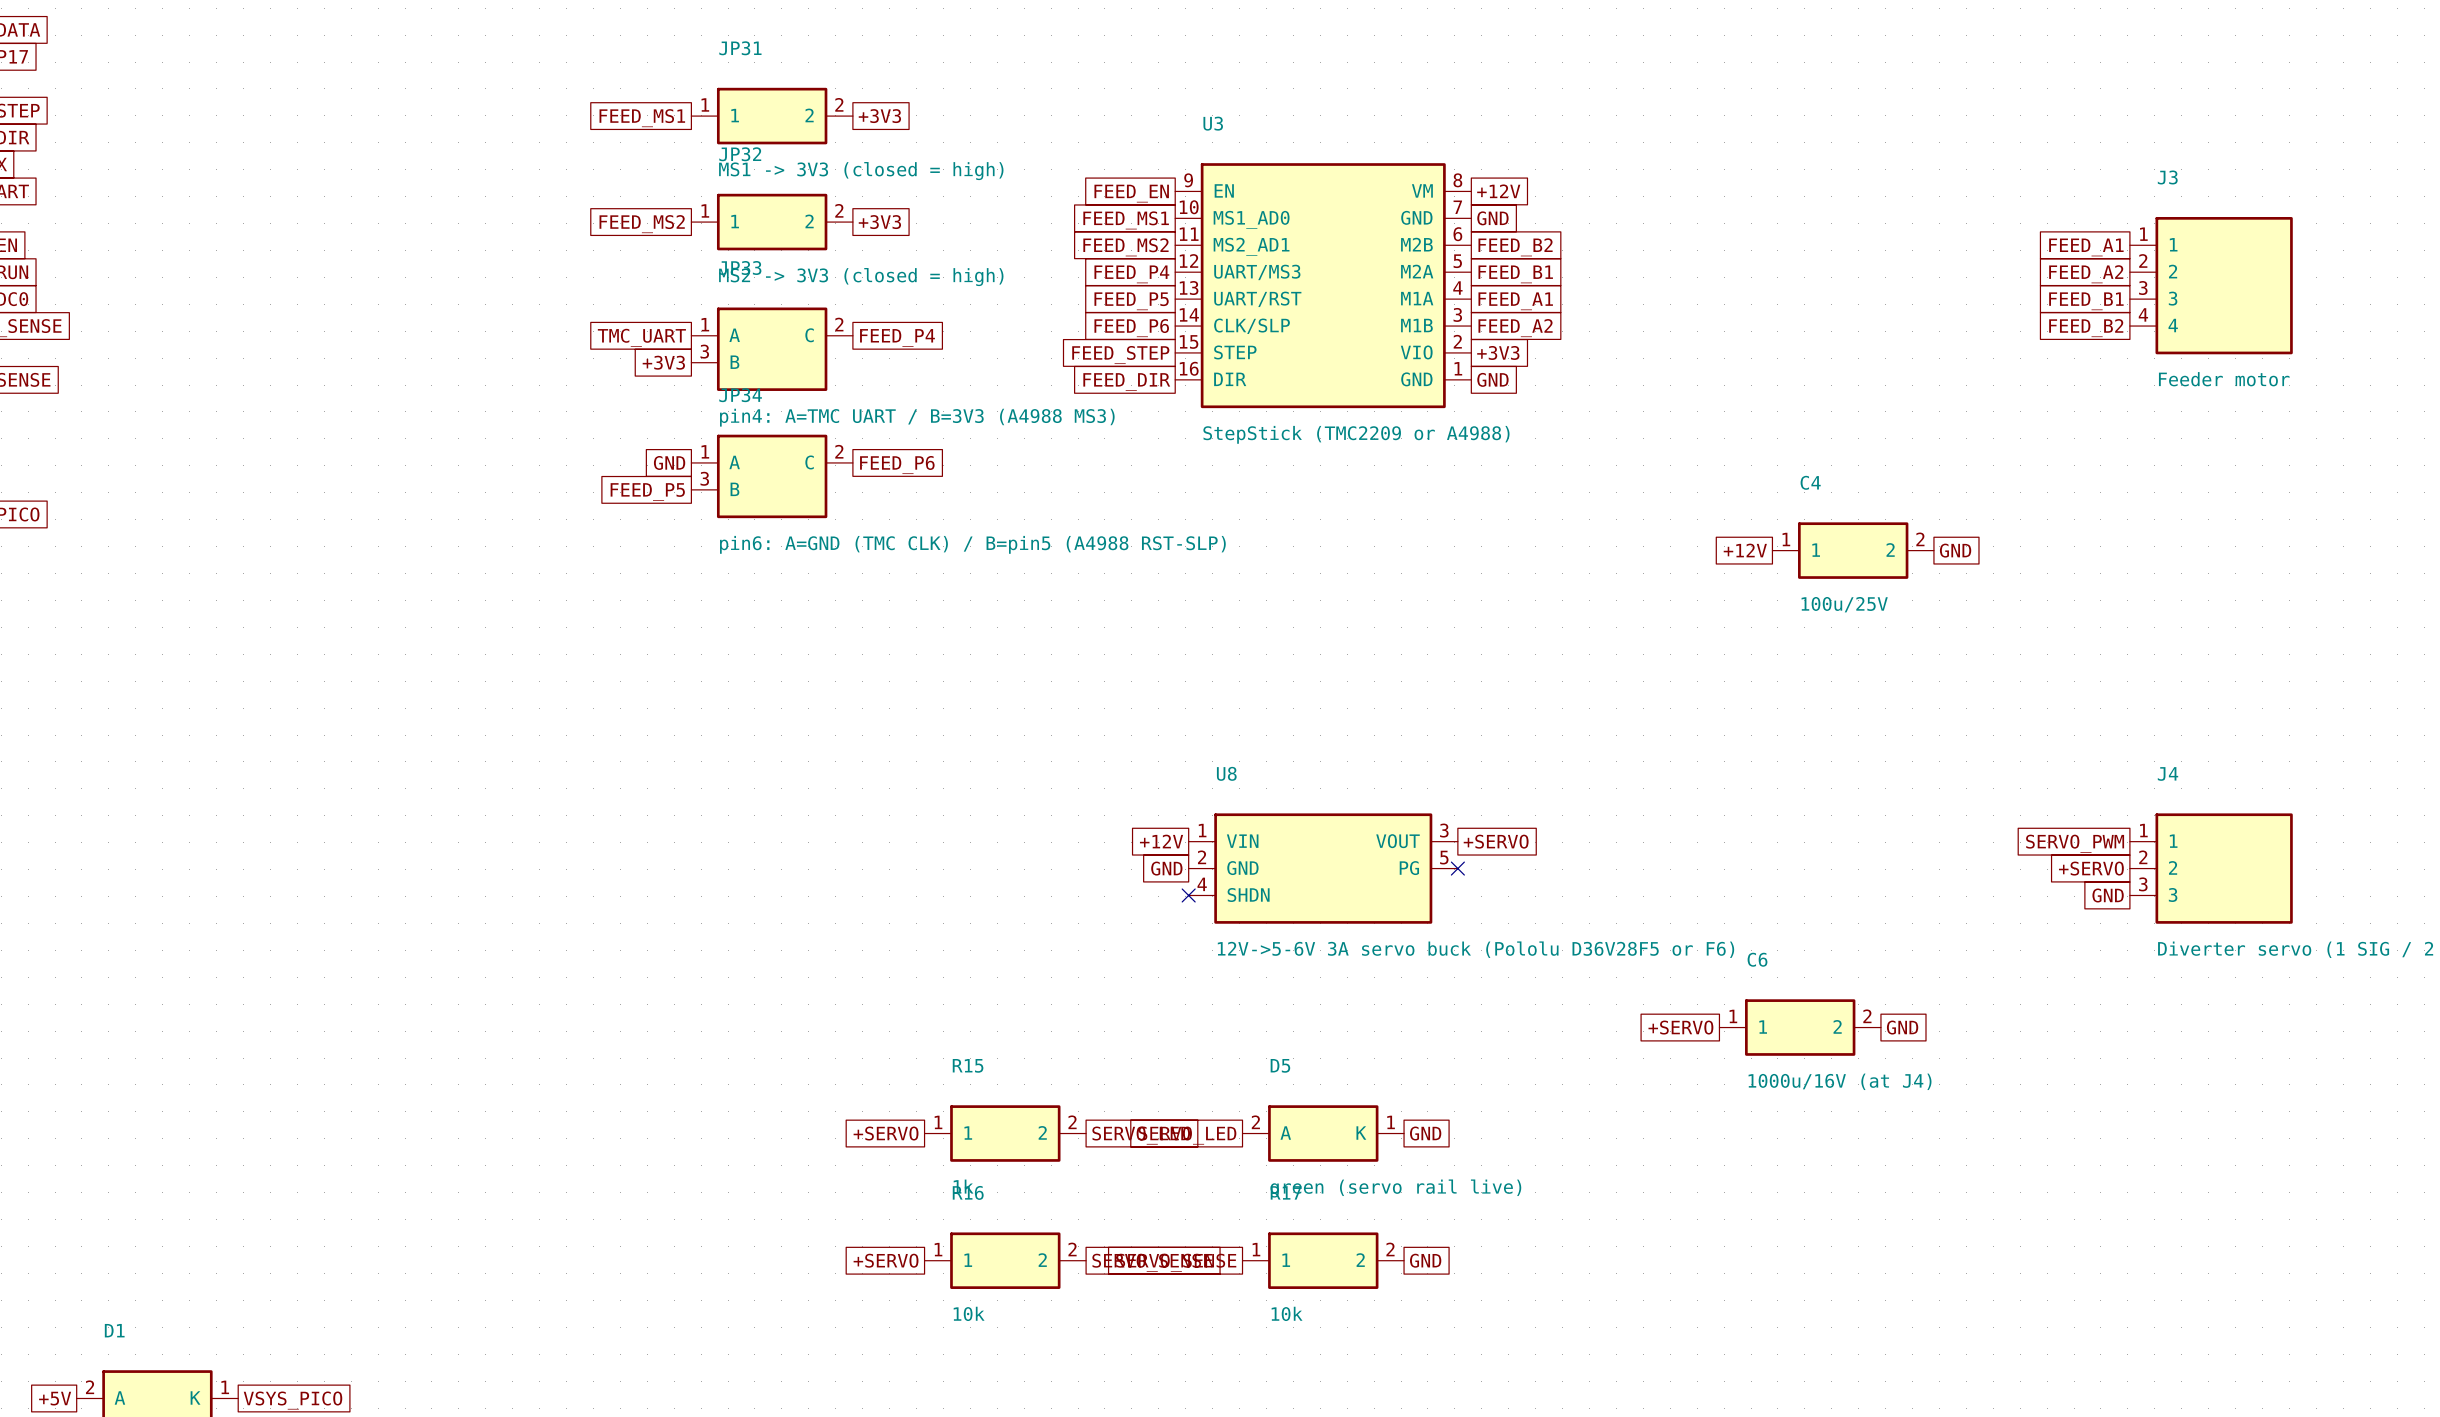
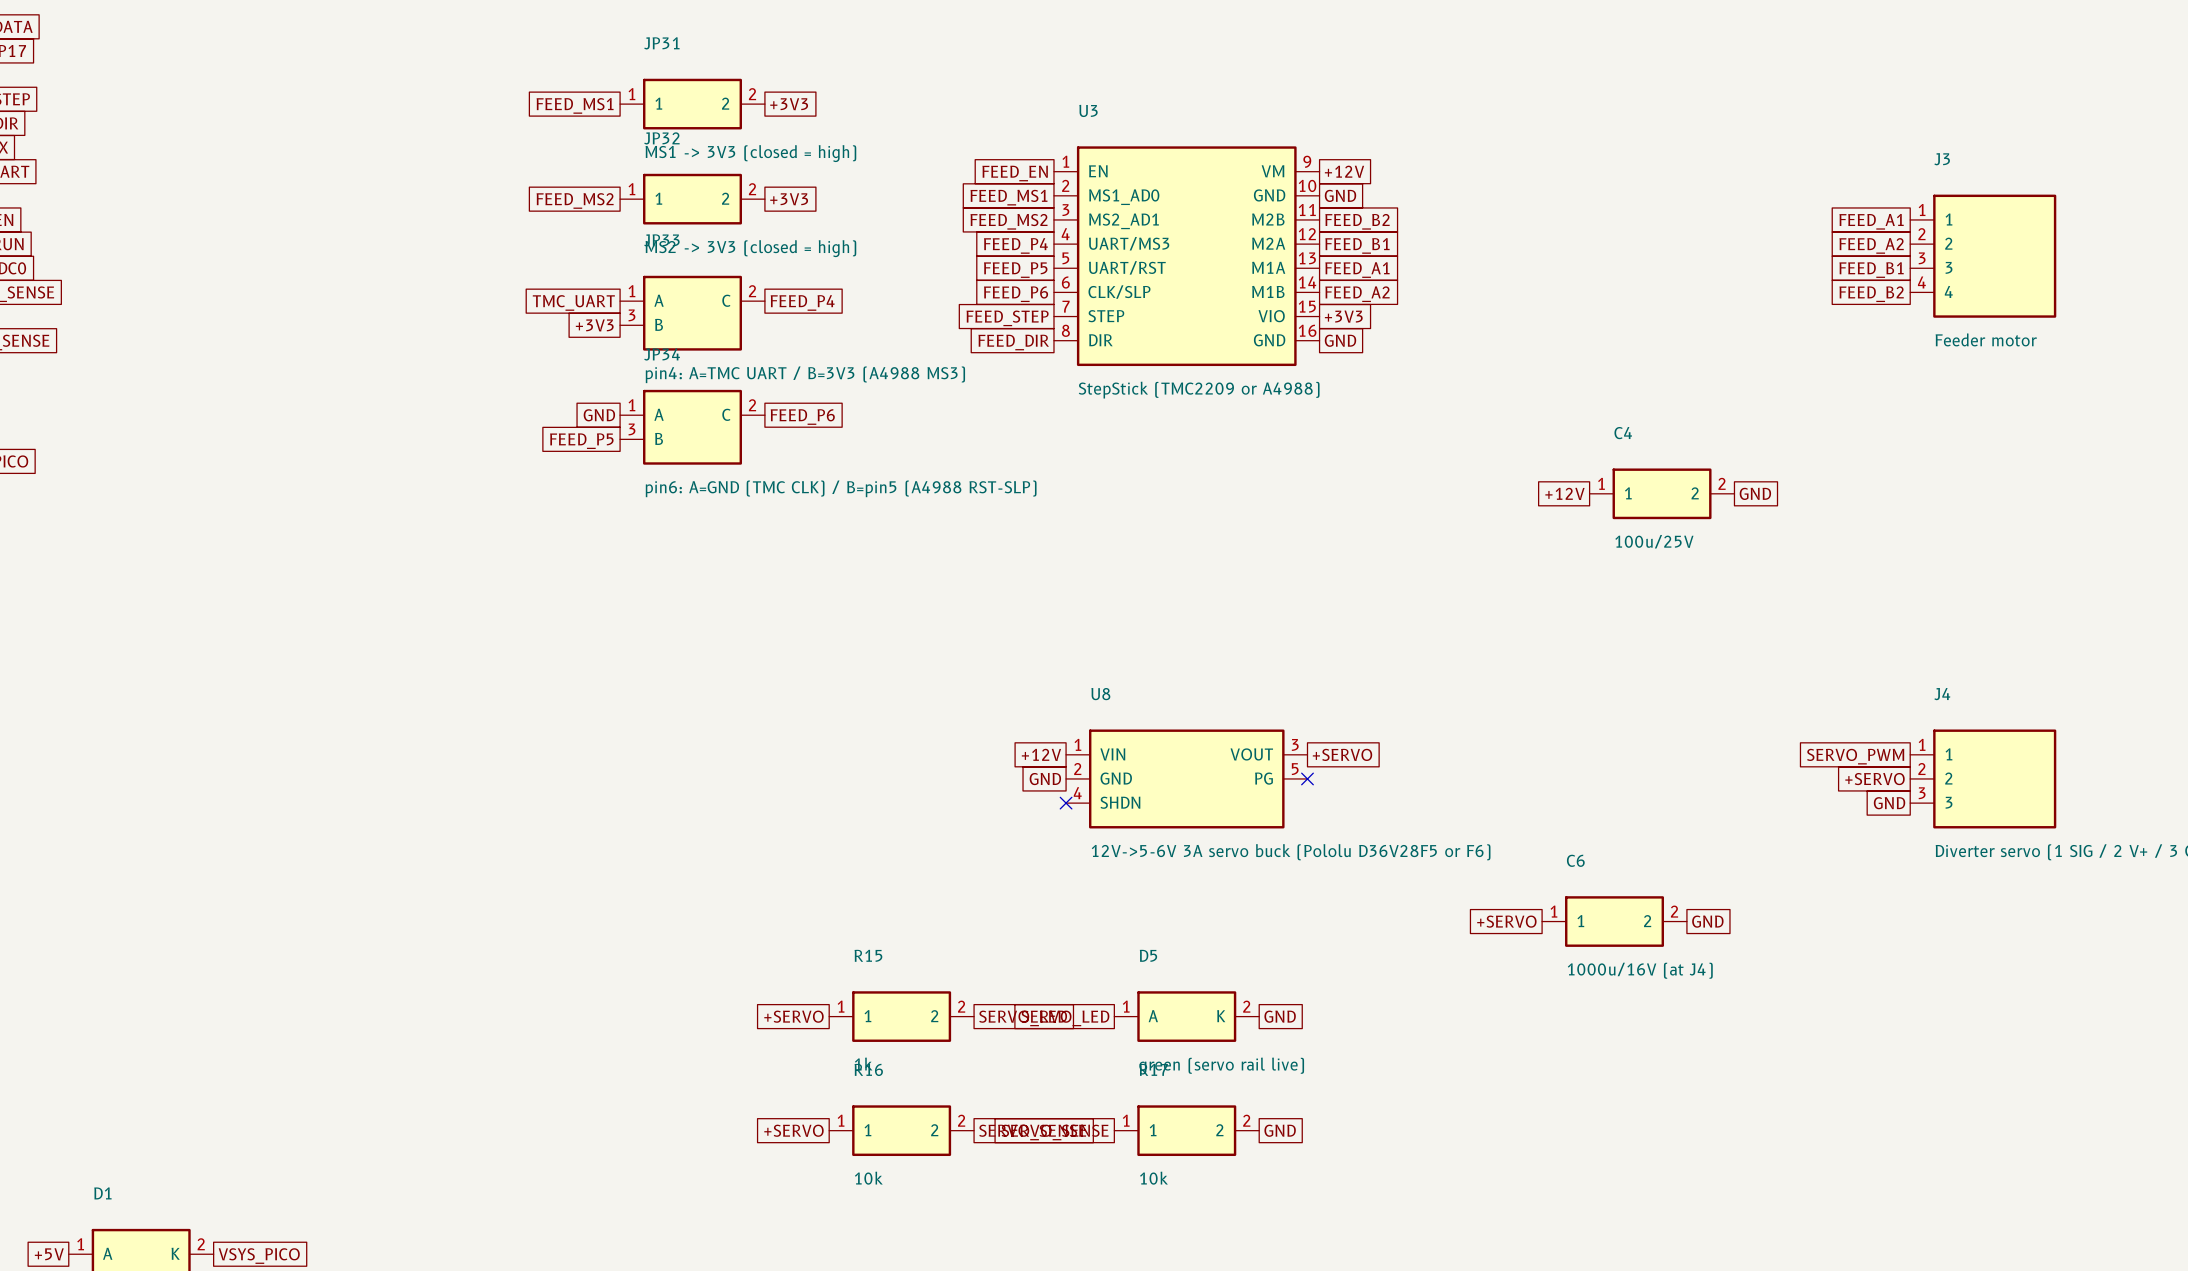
U3 symbol: [1175, 163, 1472, 409] -> [1053, 146, 1320, 367]
D5 pin number: 2 (1255, 1122) -> 1 (1126, 1006)
D5 pin number: 1 (1391, 1122) -> 2 (1246, 1006)
D1 pin number: 2 (90, 1387) -> 1 (80, 1244)
D1 pin number: 1 (225, 1387) -> 2 (201, 1244)

